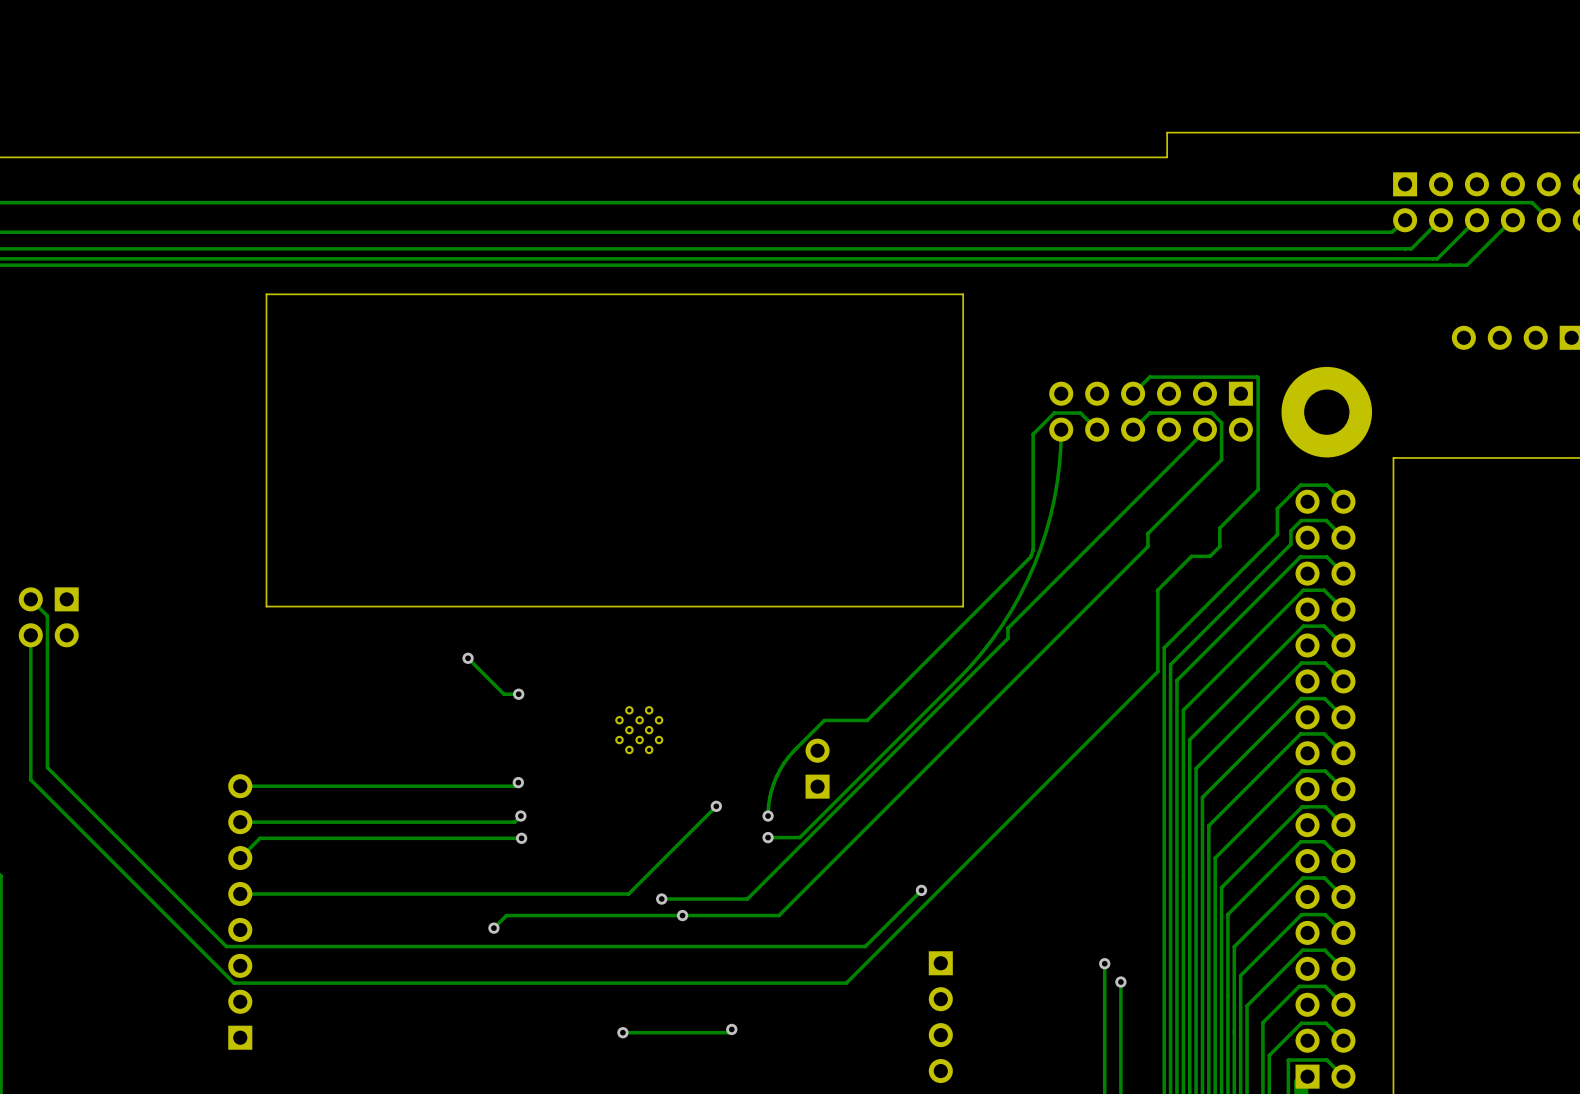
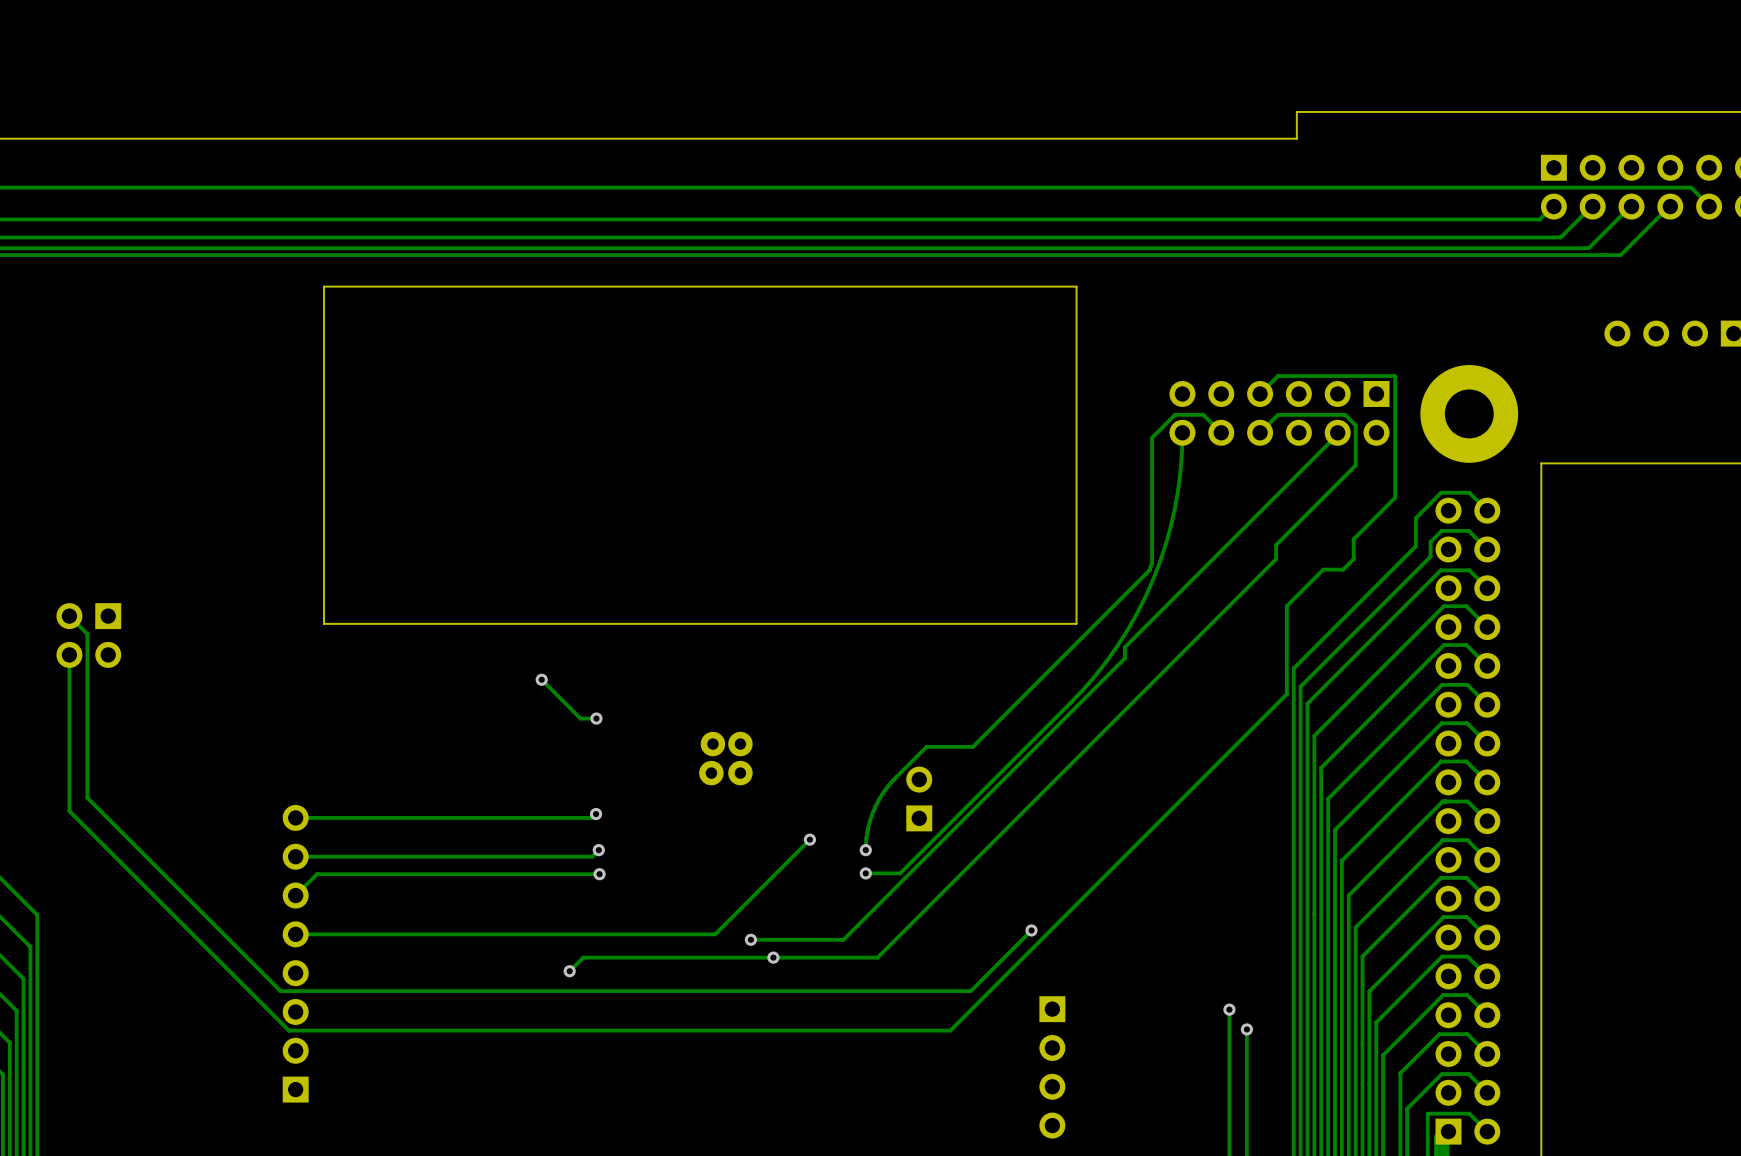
part footprint: [615, 706, 664, 755] -> [699, 731, 753, 786]
track: (731, 1029) (728, 1032) (622, 1032) -> none
via: (731, 1029) -> none
via: (622, 1032) -> none

